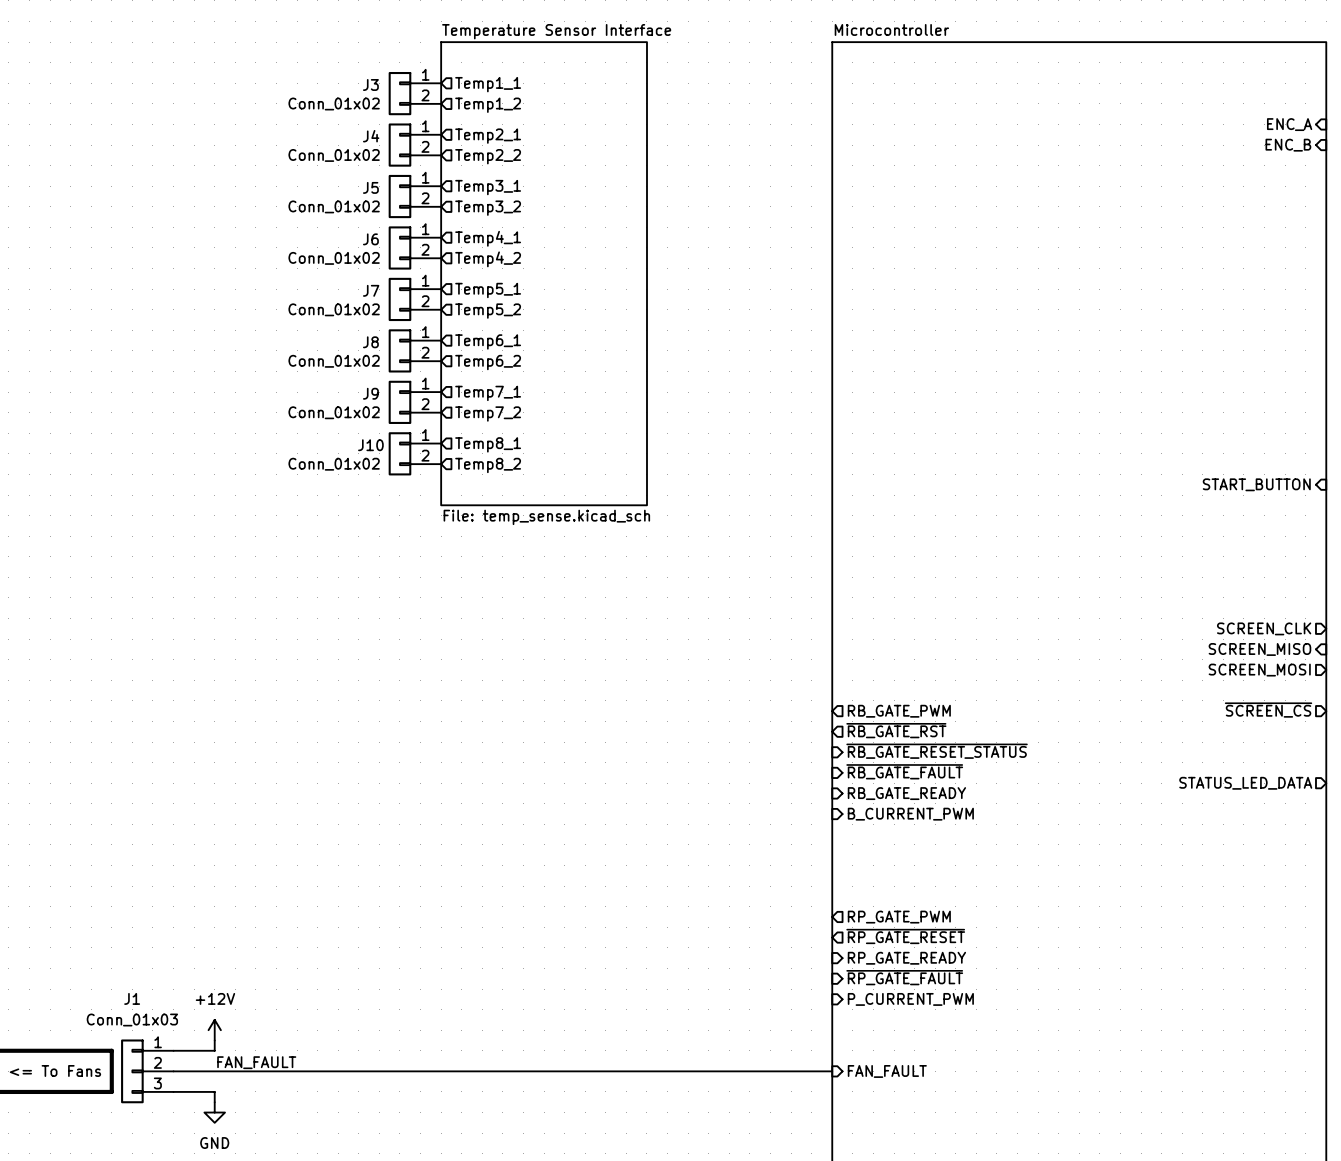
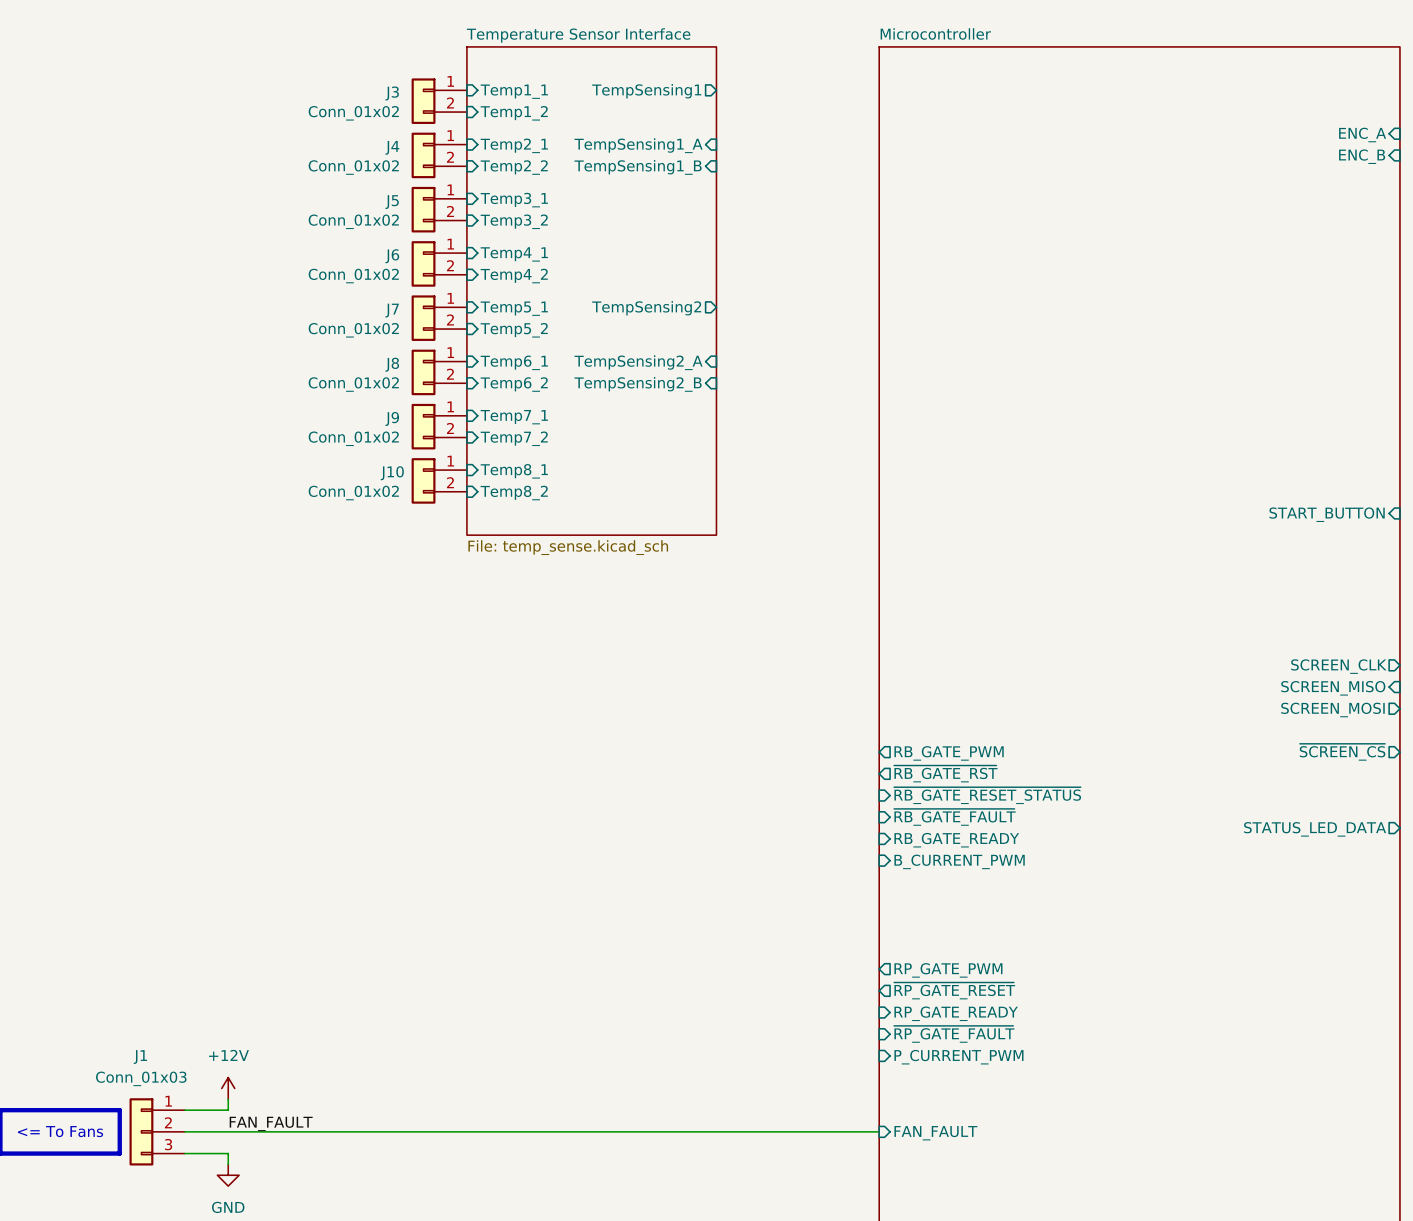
hierarchical label: Temp1_1 (488, 84) -> none
sheet pin: none -> Temp1_1 (514, 91)
sheet pin: none -> TempSensing1 (646, 91)
hierarchical label: Temp1_2 (488, 105) -> none
sheet pin: none -> Temp1_2 (514, 113)
hierarchical label: Temp2_1 (488, 136) -> none
sheet pin: none -> Temp2_1 (514, 145)
sheet pin: none -> TempSensing1_A (638, 145)
hierarchical label: Temp2_2 (488, 156) -> none
sheet pin: none -> Temp2_2 (514, 167)
sheet pin: none -> TempSensing1_B (638, 167)
hierarchical label: Temp3_1 (488, 187) -> none
sheet pin: none -> Temp3_1 (514, 200)
hierarchical label: Temp3_2 (488, 208) -> none
sheet pin: none -> Temp3_2 (514, 221)
hierarchical label: Temp4_1 (488, 238) -> none
sheet pin: none -> Temp4_1 (514, 254)
hierarchical label: Temp4_2 (488, 259) -> none
sheet pin: none -> Temp4_2 (514, 276)
sheet Temperature Sensor Interface: File: temp_sense.kicad_sch (544, 273) -> none
sheet Temperature Sensor Interface: none -> File: temp_sense.kicad_sch (591, 291)
hierarchical label: Temp5_1 (488, 290) -> none
sheet pin: none -> Temp5_1 (514, 308)
sheet pin: none -> TempSensing2 (646, 308)
hierarchical label: Temp5_2 (488, 311) -> none
sheet pin: none -> Temp5_2 (514, 330)
hierarchical label: Temp6_1 (488, 341) -> none
sheet pin: none -> Temp6_1 (514, 362)
sheet pin: none -> TempSensing2_A (638, 362)
hierarchical label: Temp6_2 (488, 362) -> none
sheet pin: none -> Temp6_2 (514, 384)
sheet pin: none -> TempSensing2_B (638, 384)
hierarchical label: Temp7_1 (488, 393) -> none
sheet pin: none -> Temp7_1 (514, 417)
hierarchical label: Temp7_2 (488, 413) -> none
sheet pin: none -> Temp7_2 (514, 438)
hierarchical label: Temp8_1 (488, 444) -> none
sheet pin: none -> Temp8_1 (514, 471)
hierarchical label: Temp8_2 (488, 465) -> none
sheet pin: none -> Temp8_2 (514, 493)

